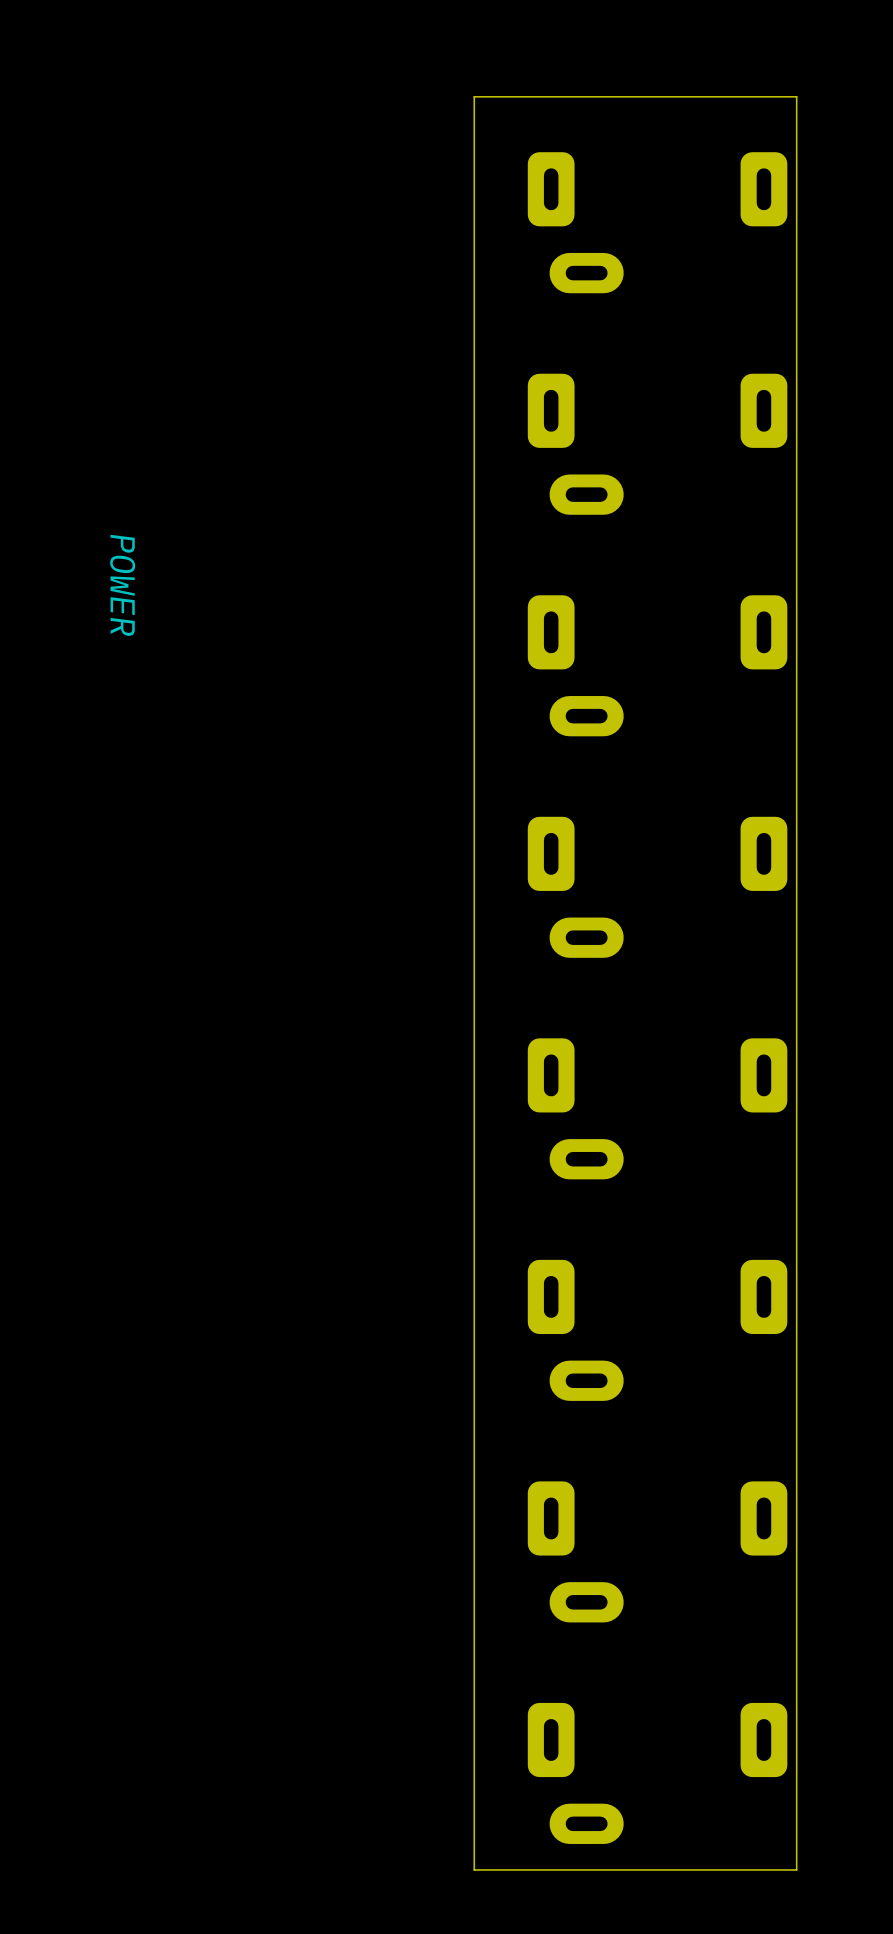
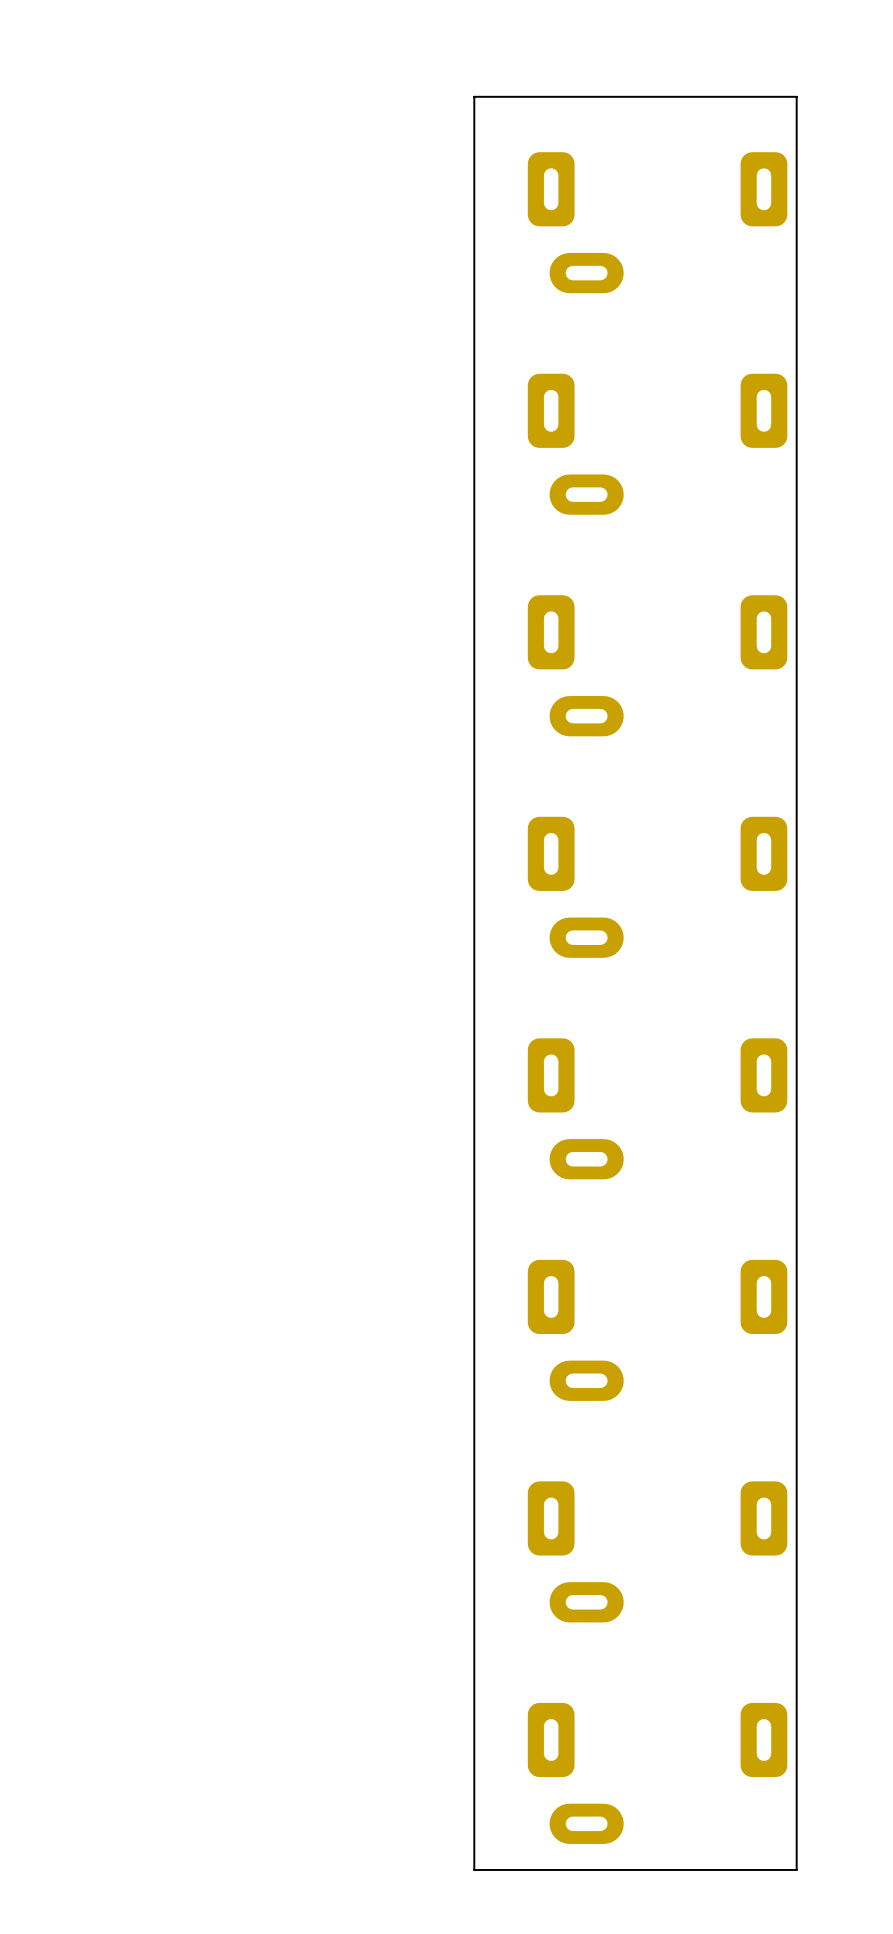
text: POWER (122, 585) -> none

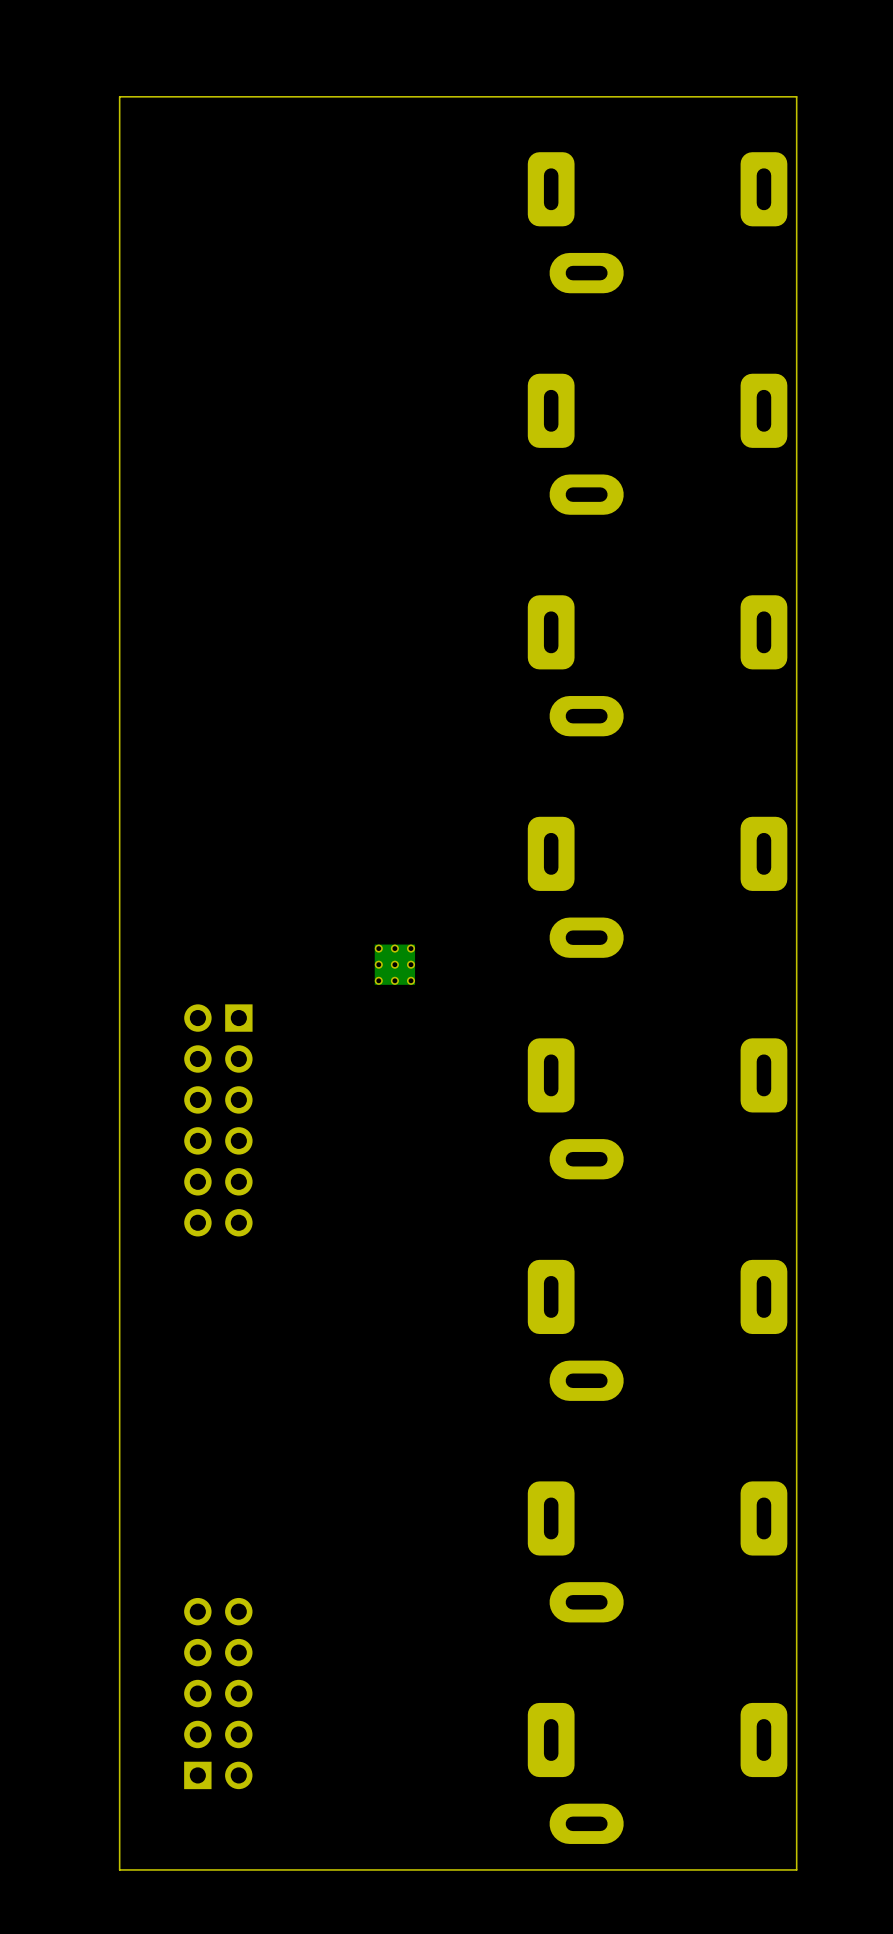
board edge: (474, 96) (474, 1869) -> (474, 96) (119, 96) (119, 1869) (474, 1869)
part: none -> (394, 964)
part: none -> (218, 1120)
part: none -> (218, 1693)

